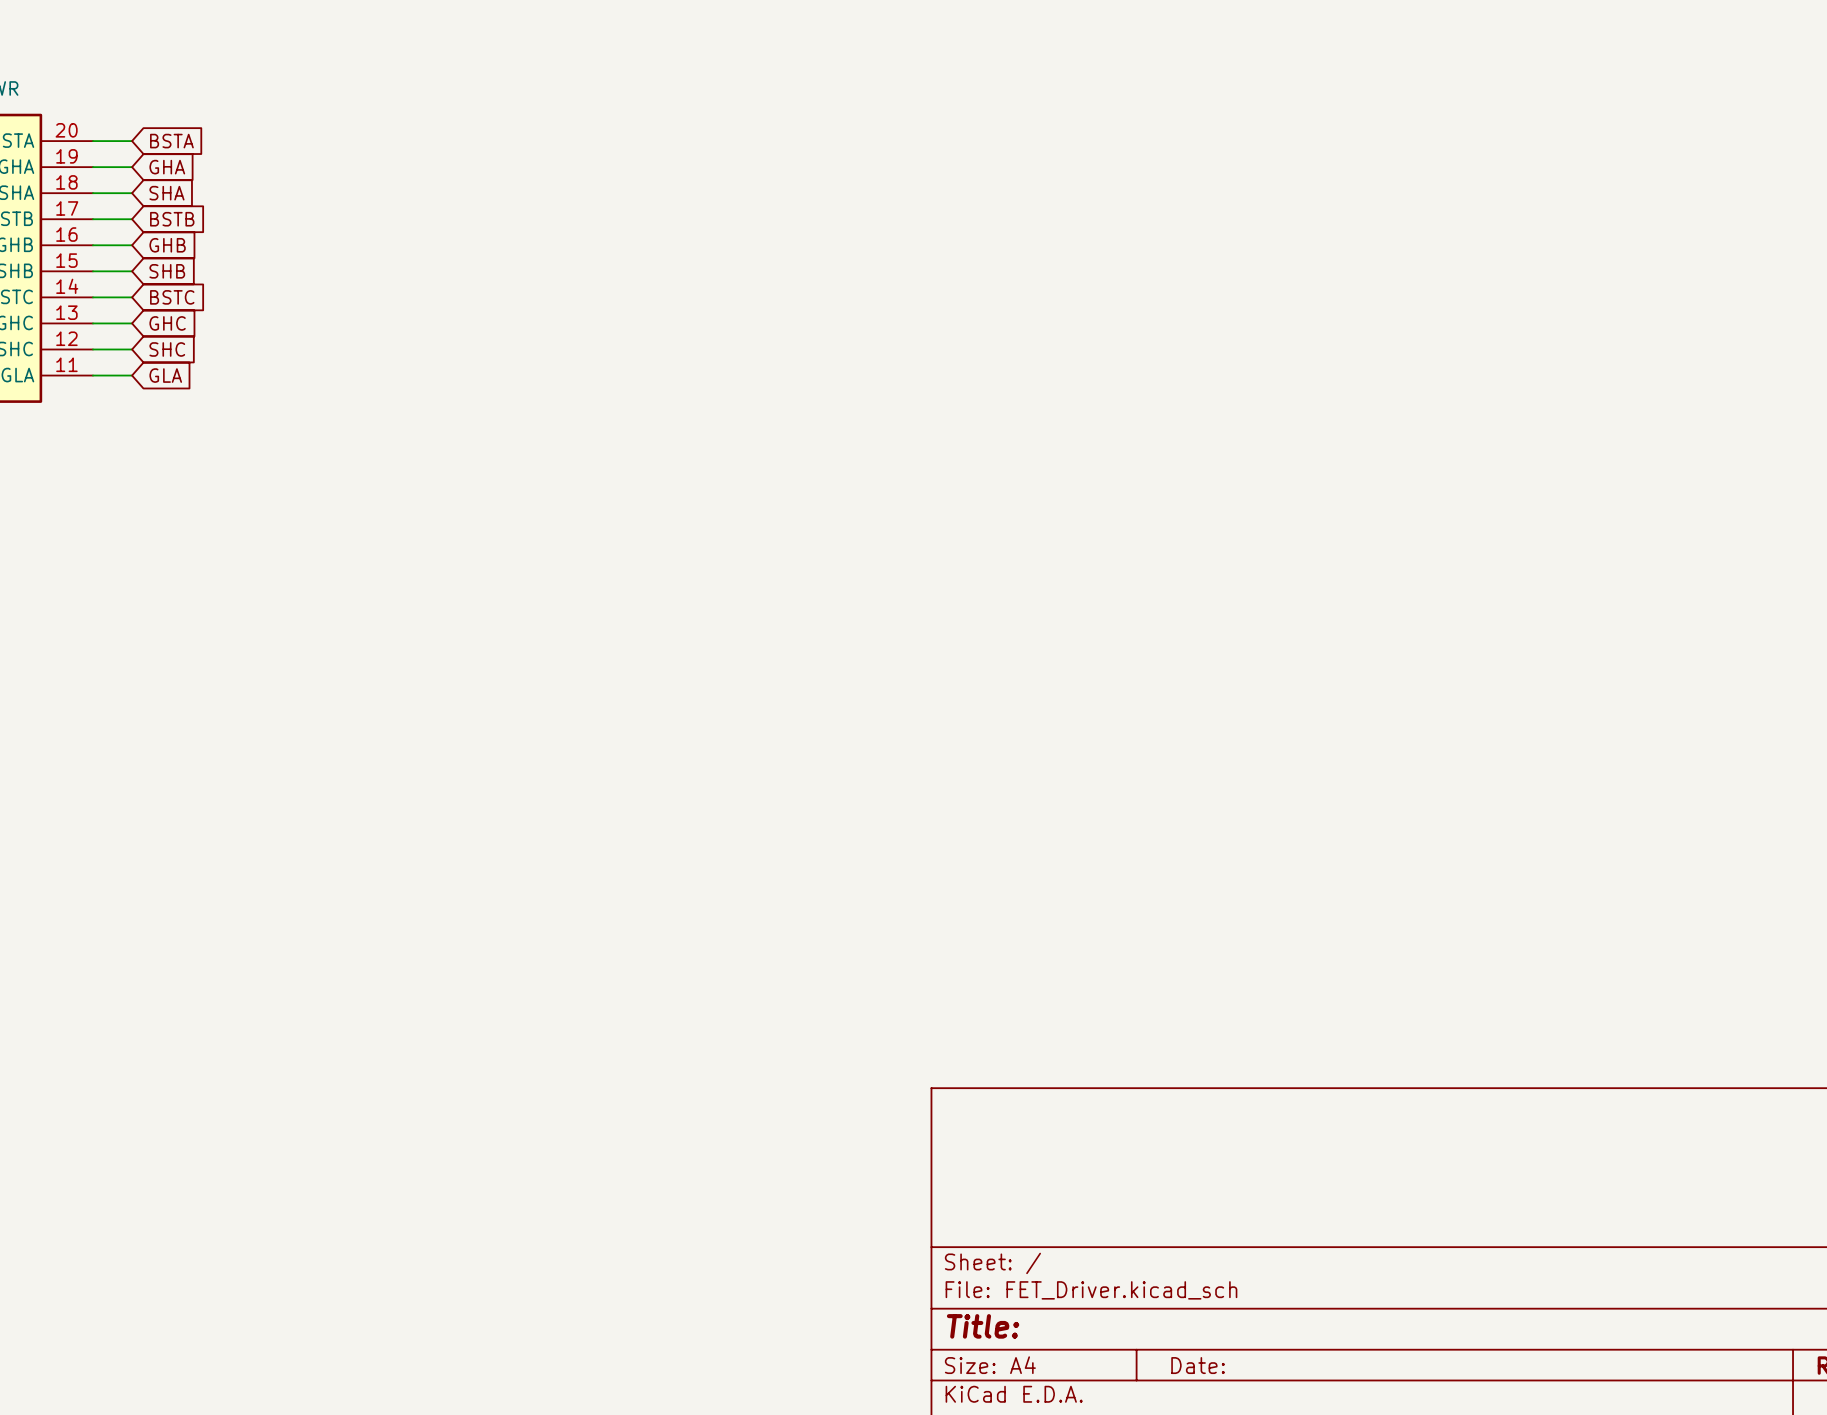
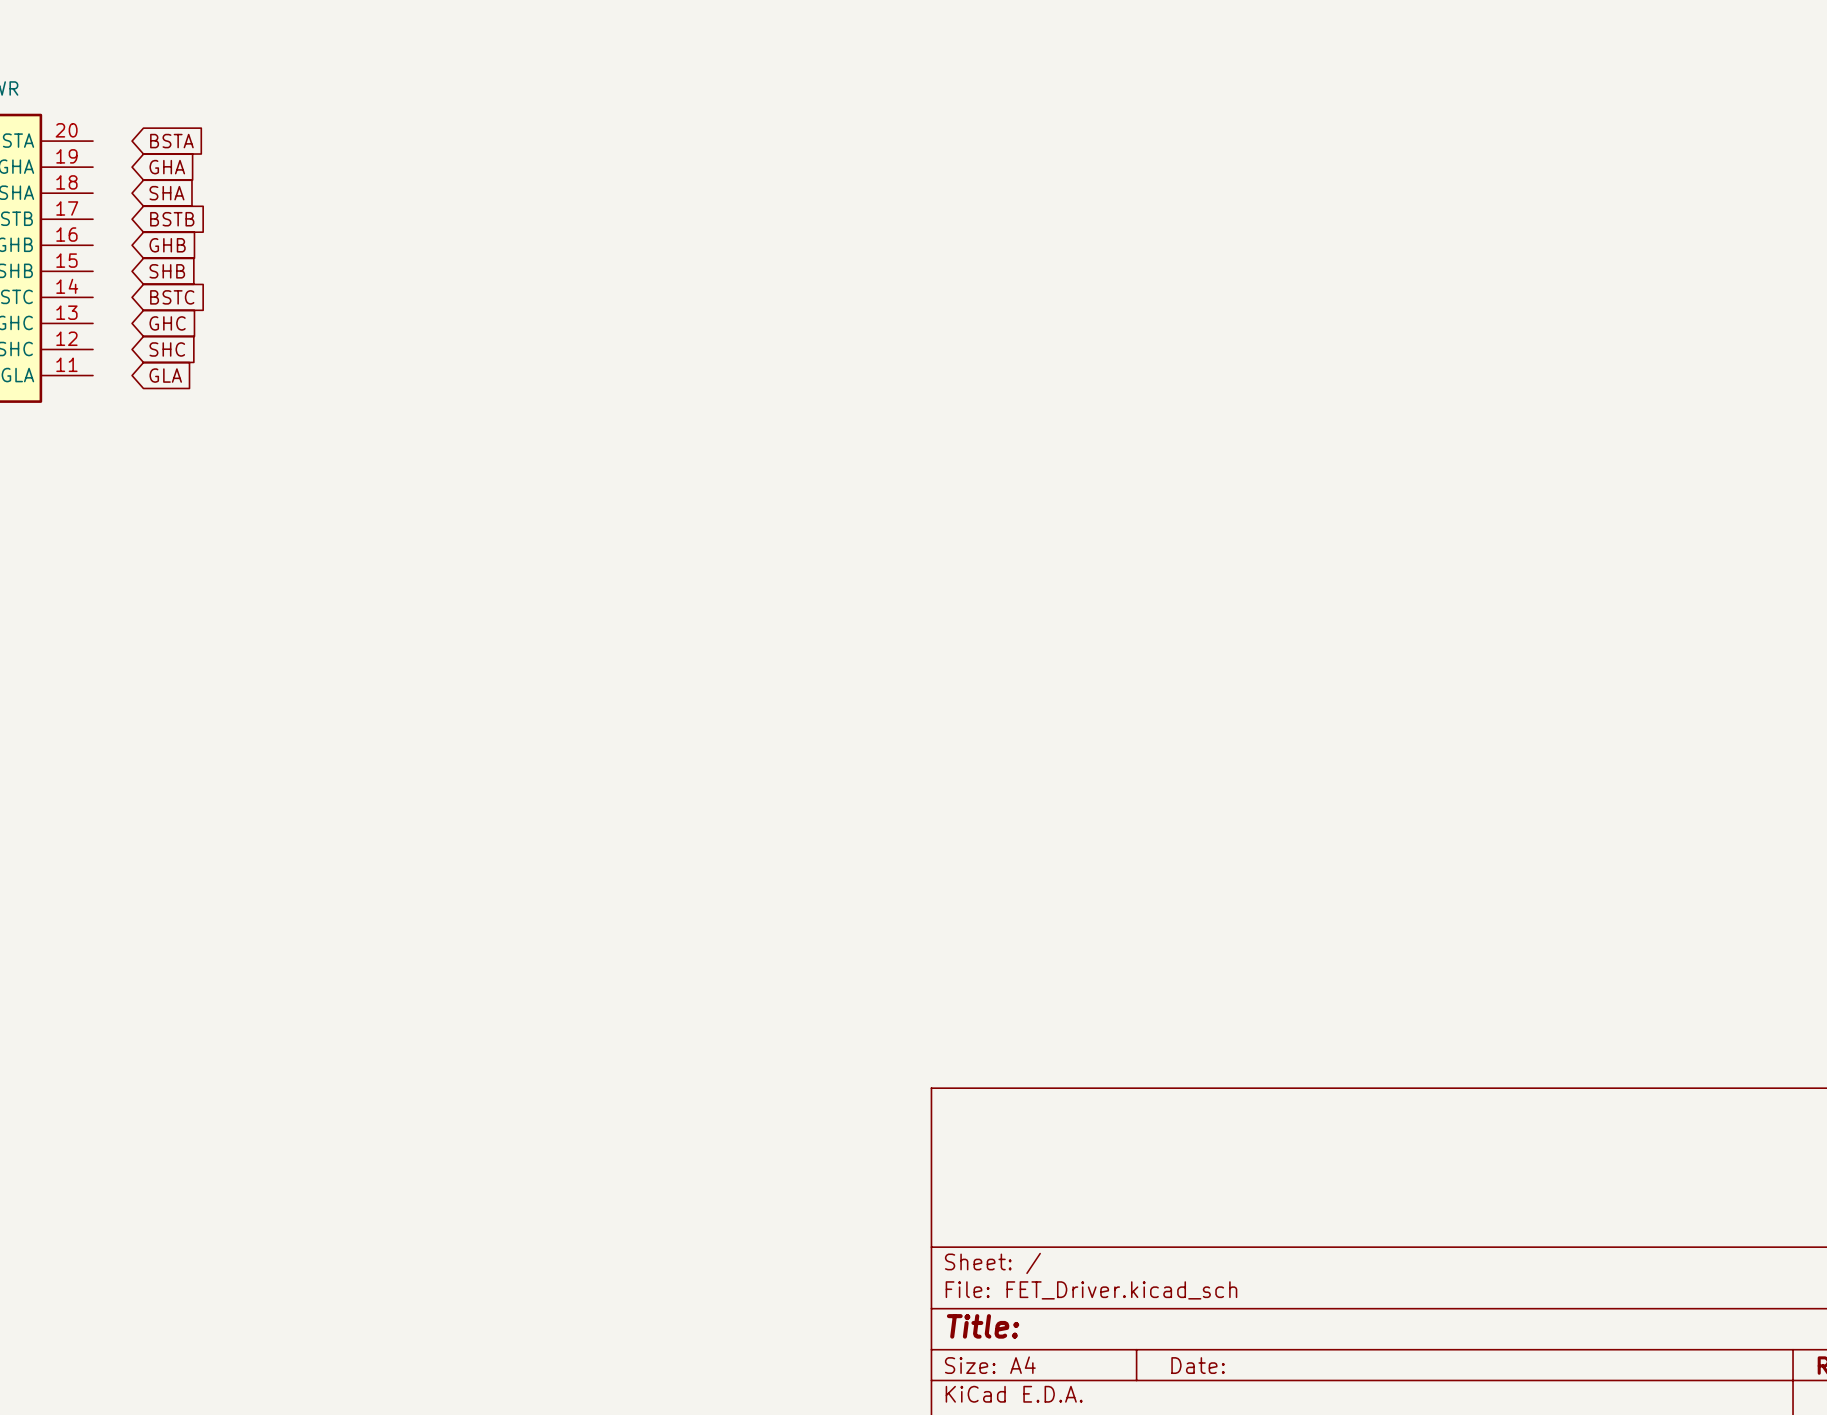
wire: (92, 141) (132, 141) -> none
wire: (92, 167) (132, 167) -> none
wire: (92, 193) (132, 193) -> none
wire: (92, 219) (132, 219) -> none
wire: (92, 245) (132, 245) -> none
wire: (92, 271) (132, 271) -> none
wire: (92, 297) (132, 297) -> none
wire: (92, 323) (132, 323) -> none
wire: (92, 349) (132, 349) -> none
wire: (92, 375) (132, 375) -> none

